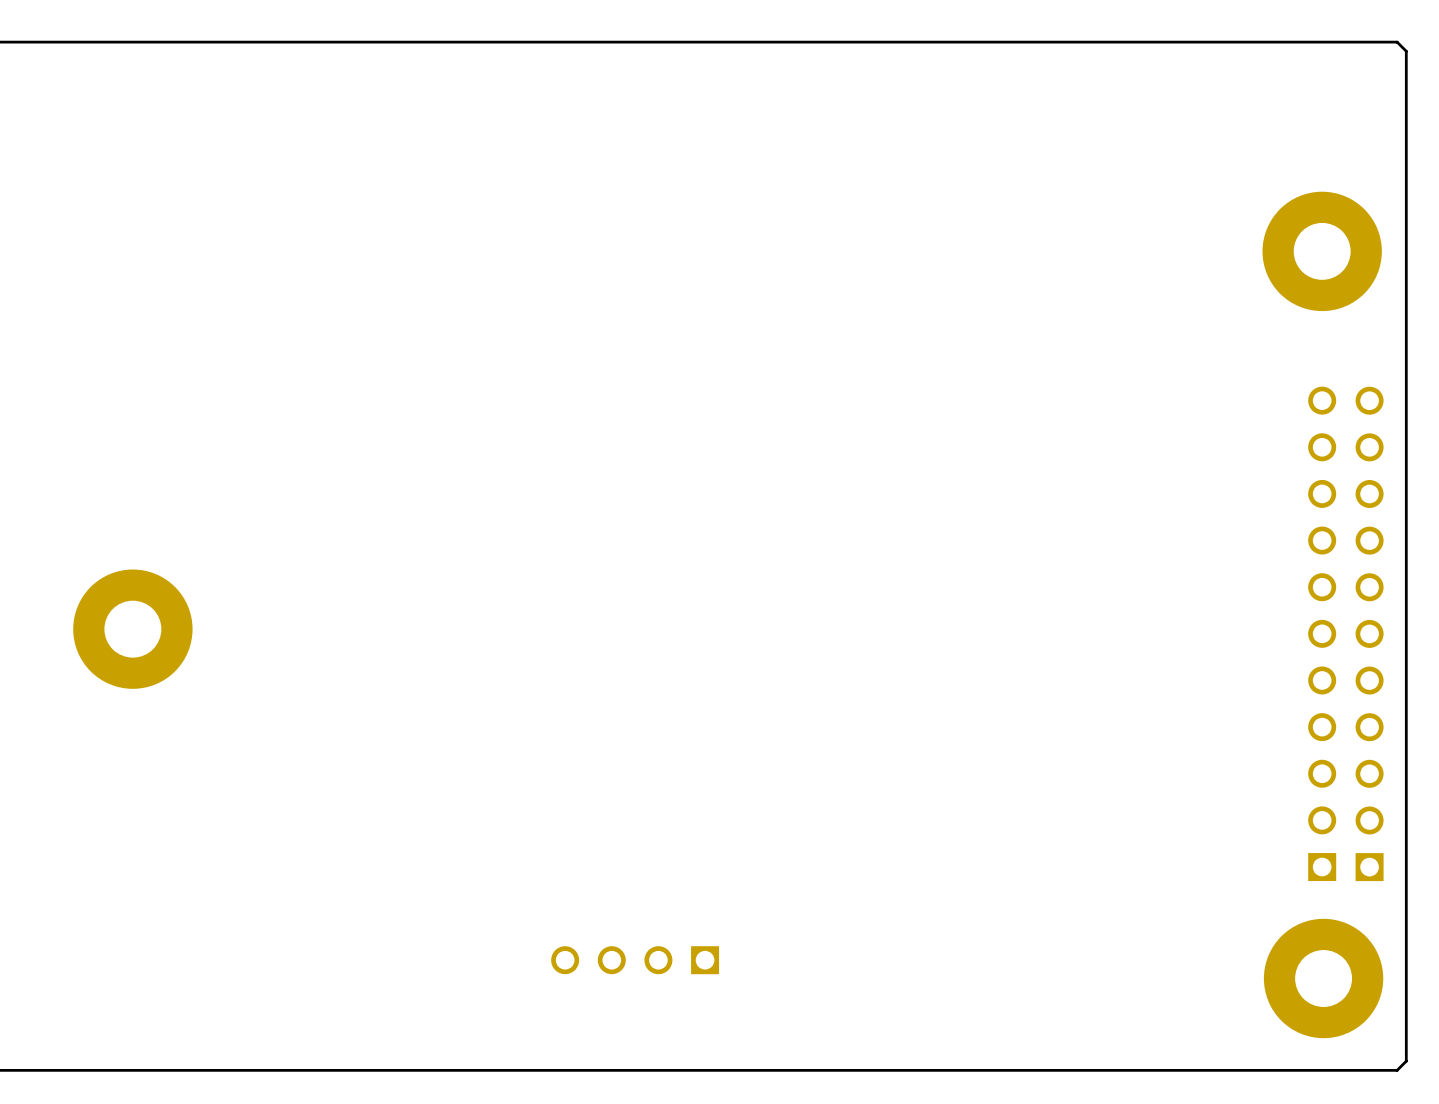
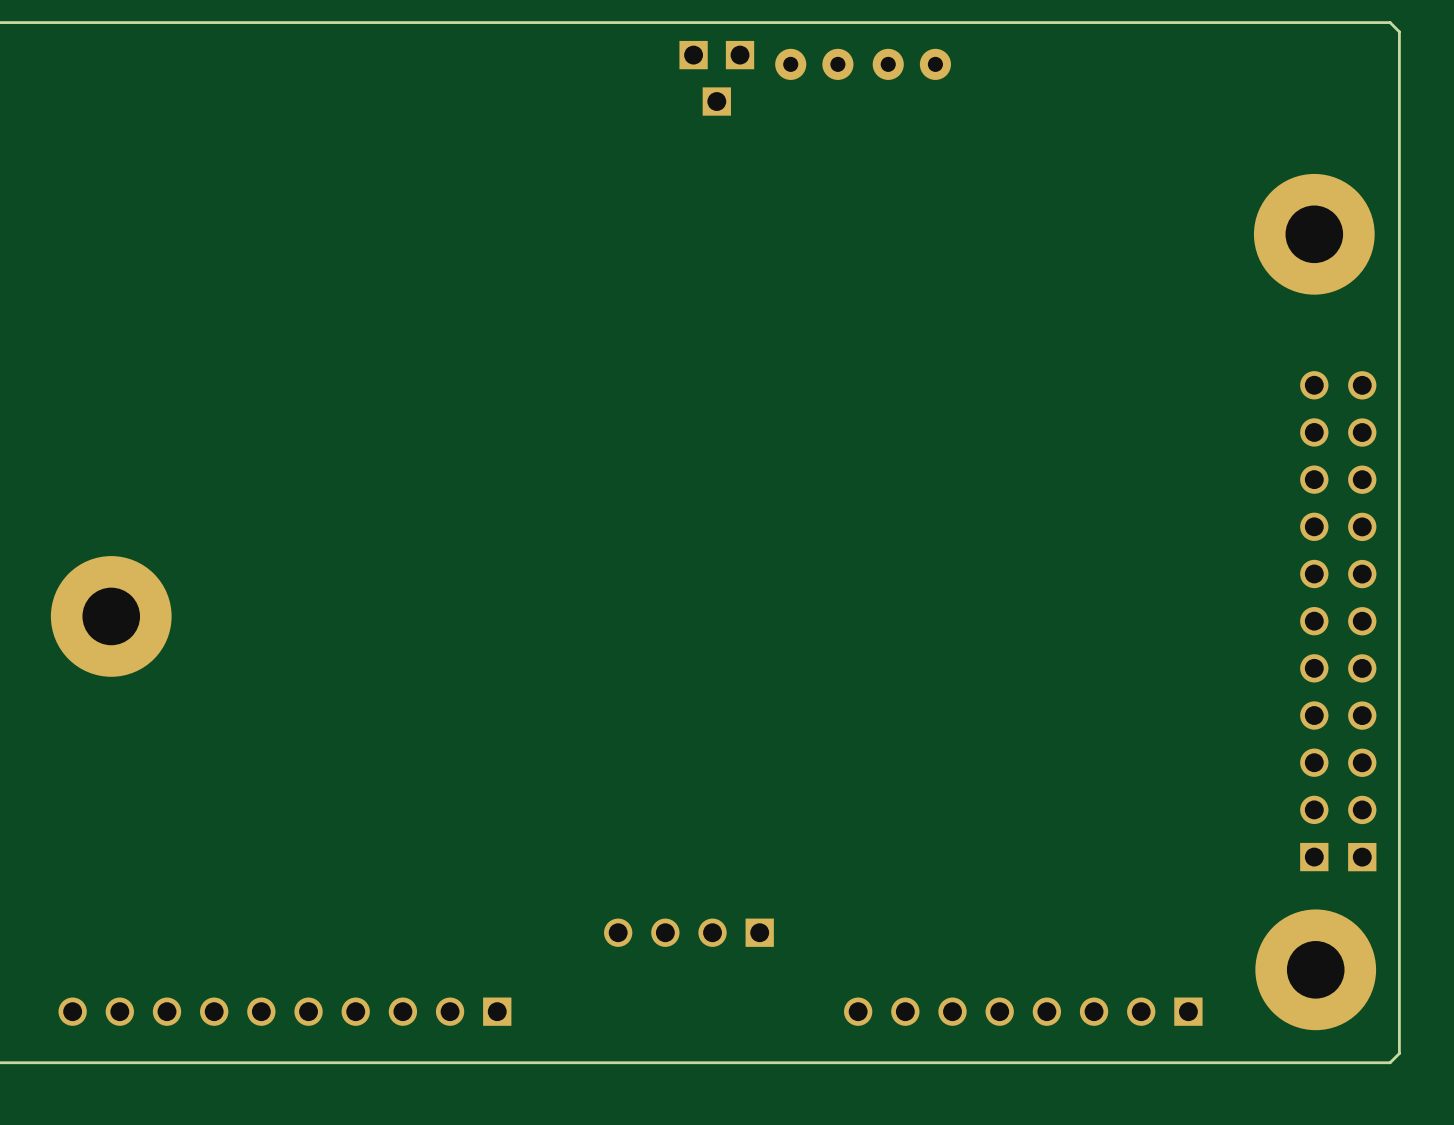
part: none -> (693, 55)
part: none -> (740, 55)
part: none -> (814, 64)
part: none -> (911, 64)
part: none -> (716, 101)
part position: (635, 960) -> (688, 932)
part: none -> (284, 1011)
part: none -> (1023, 1011)

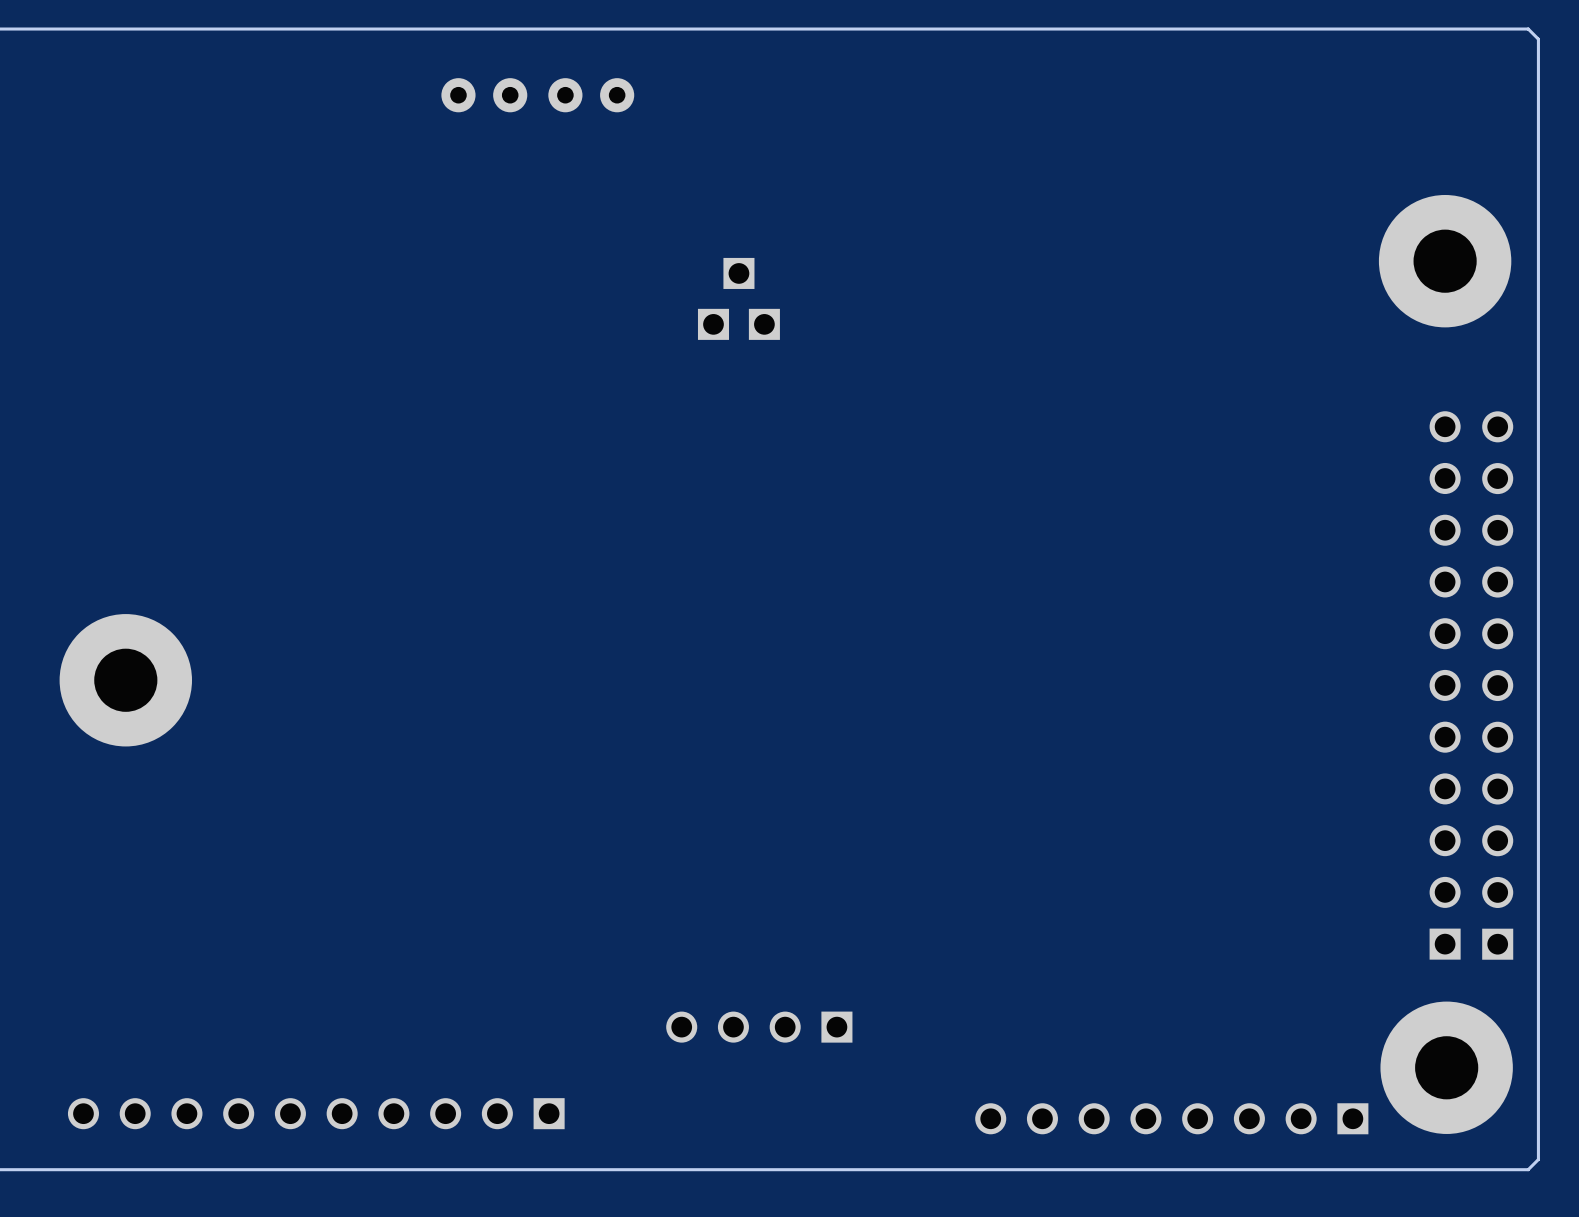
part: (693, 55) -> none
part: (740, 55) -> none
part: (814, 64) -> none
part: (911, 64) -> none
part: none -> (484, 95)
part: none -> (591, 95)
part: (716, 101) -> none
part: none -> (738, 273)
part: none -> (713, 324)
part: none -> (764, 324)
part position: (1023, 1011) -> (1171, 1118)

